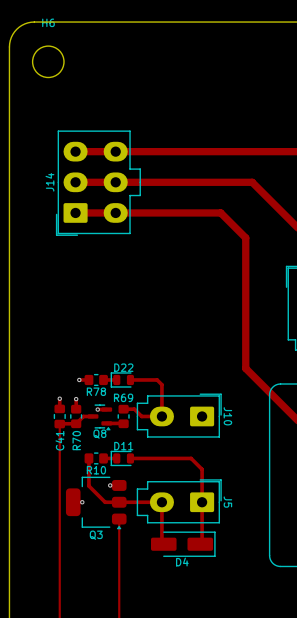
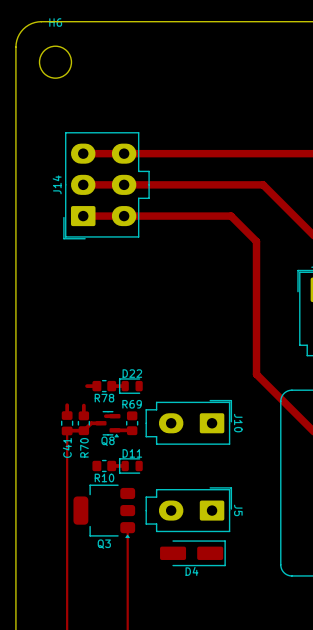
via: (79, 379) -> none
track: (130, 379) (157, 379) (161, 384) (161, 416) (141, 416) (134, 409) (123, 409) -> none
via: (59, 398) -> none
via: (76, 399) -> none
via: (97, 409) -> none
track: (88, 458) (88, 486) (105, 502) (161, 502) (161, 542) (163, 544) -> none
track: (130, 458) (191, 458) (202, 469) (202, 542) (200, 544) -> none
via: (110, 485) -> none
via: (82, 502) -> none

